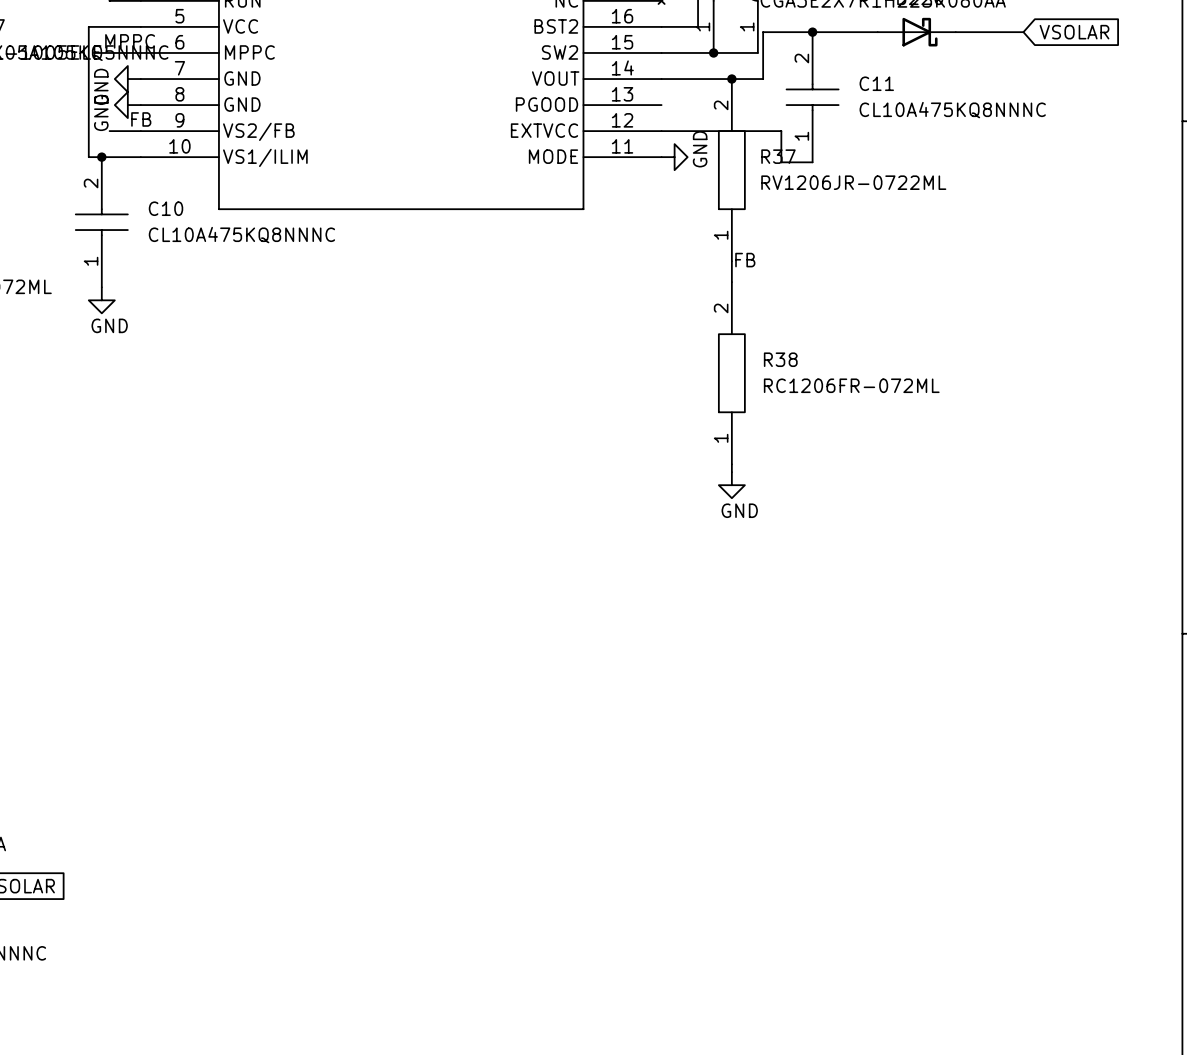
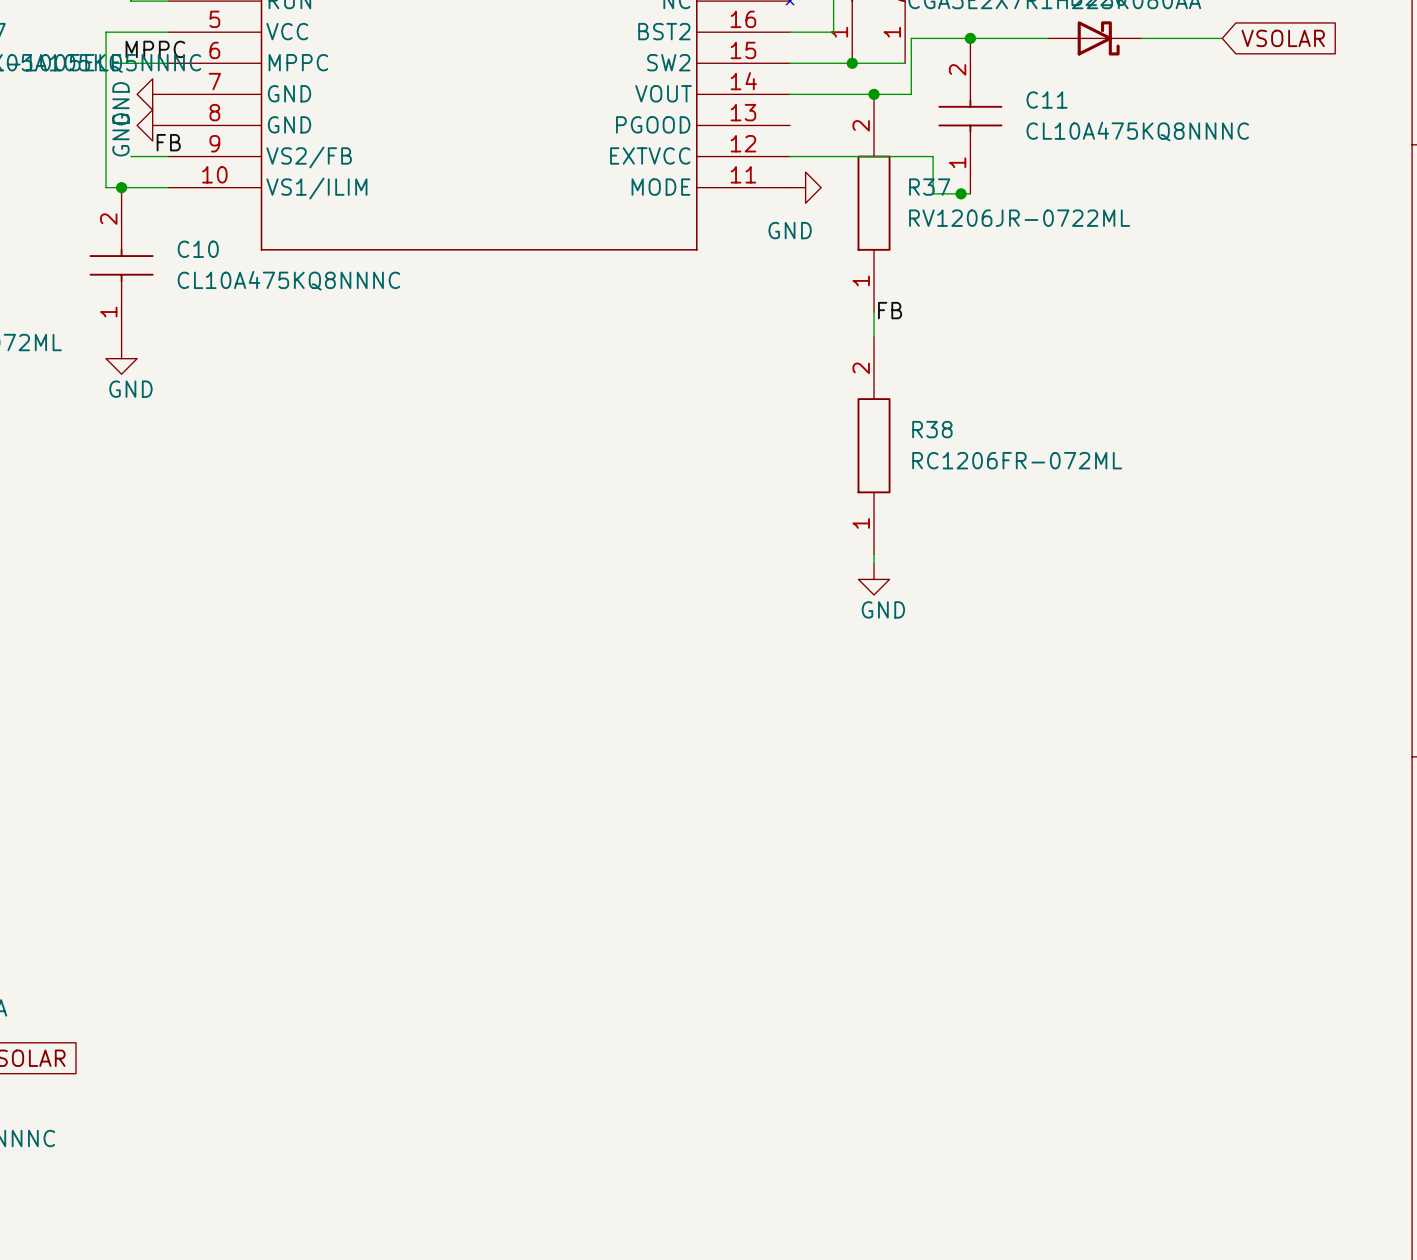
power symbol text rotation: 0° (700, 149) -> 90° clockwise (790, 230)
power symbol text position: GND (700, 149) -> GND (790, 230)
junction: none -> (961, 193)

